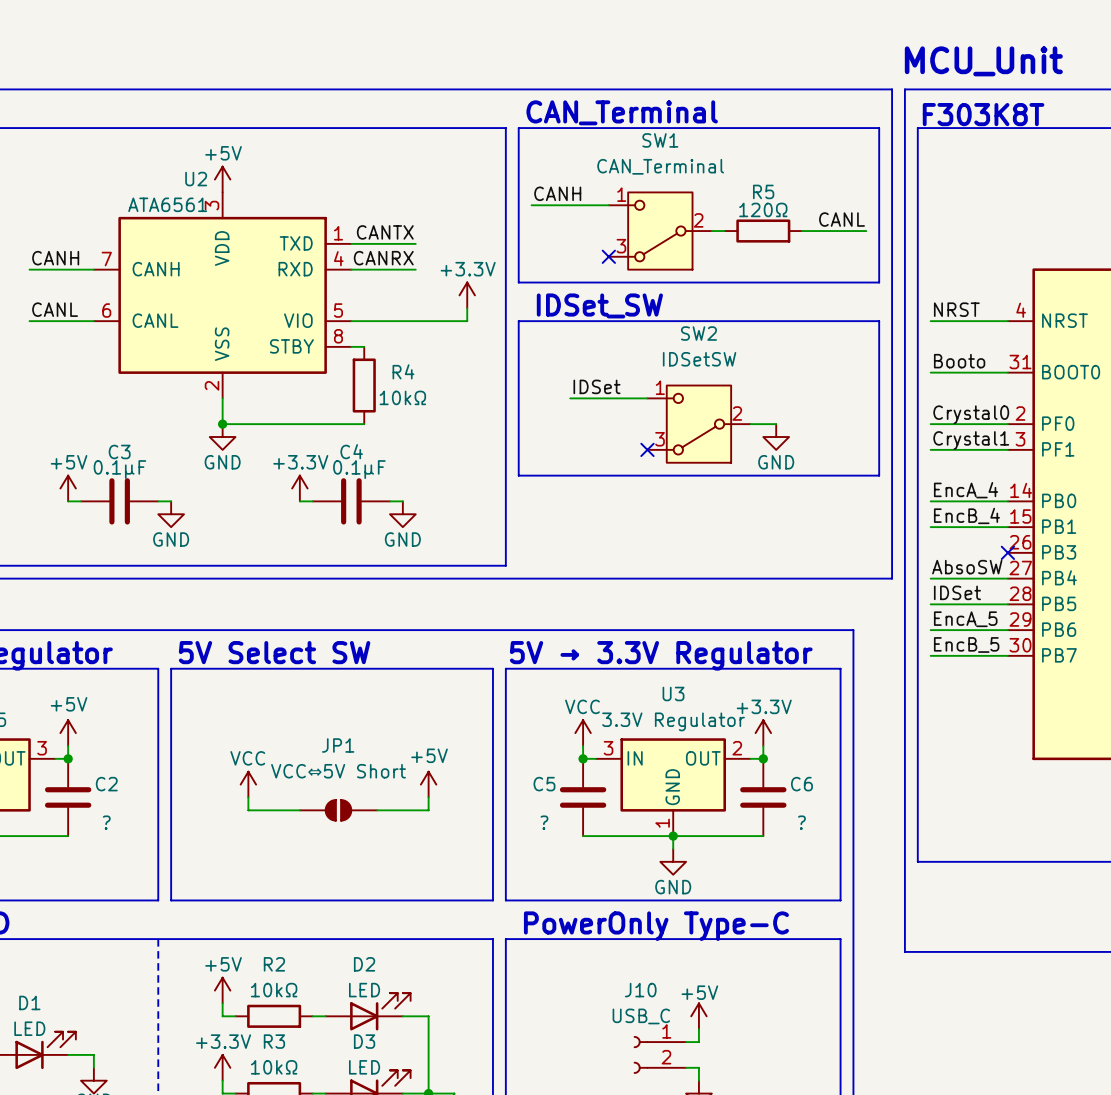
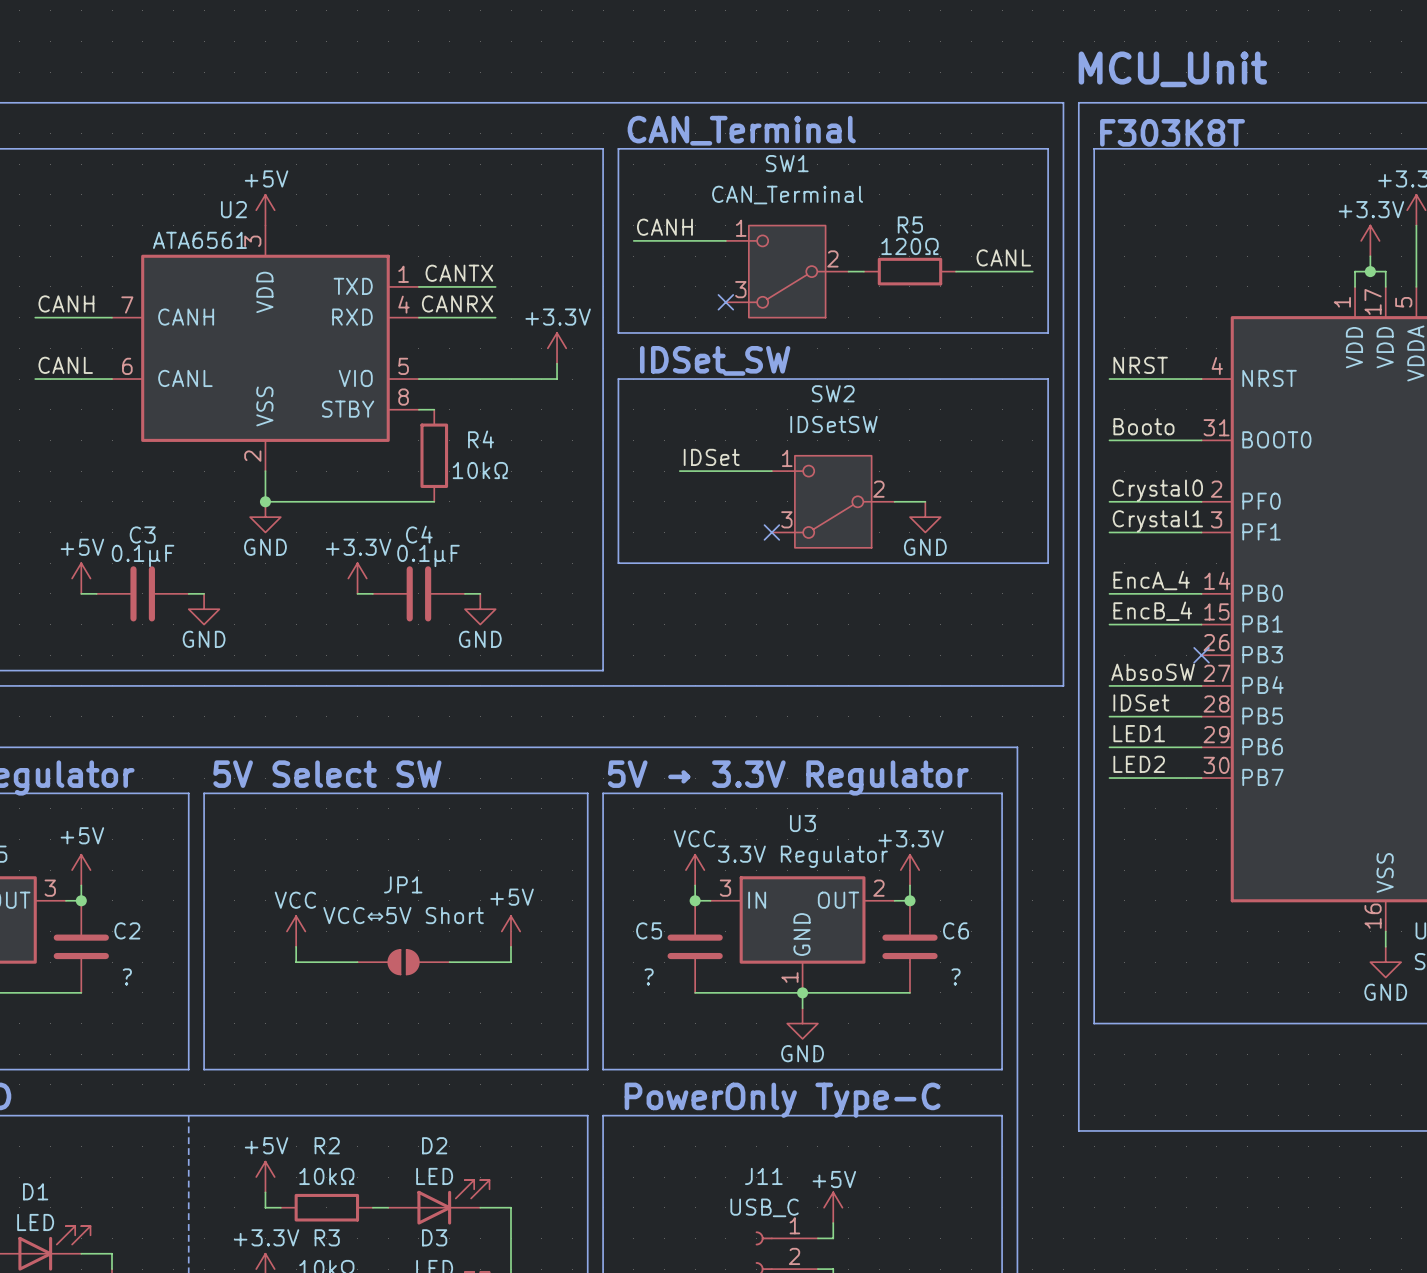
label: EncA_5 (965, 619) -> LED1 (1139, 733)
label: EncB_5 (966, 644) -> LED2 (1139, 764)
J10 name: J10 (640, 990) -> J11 (763, 1176)

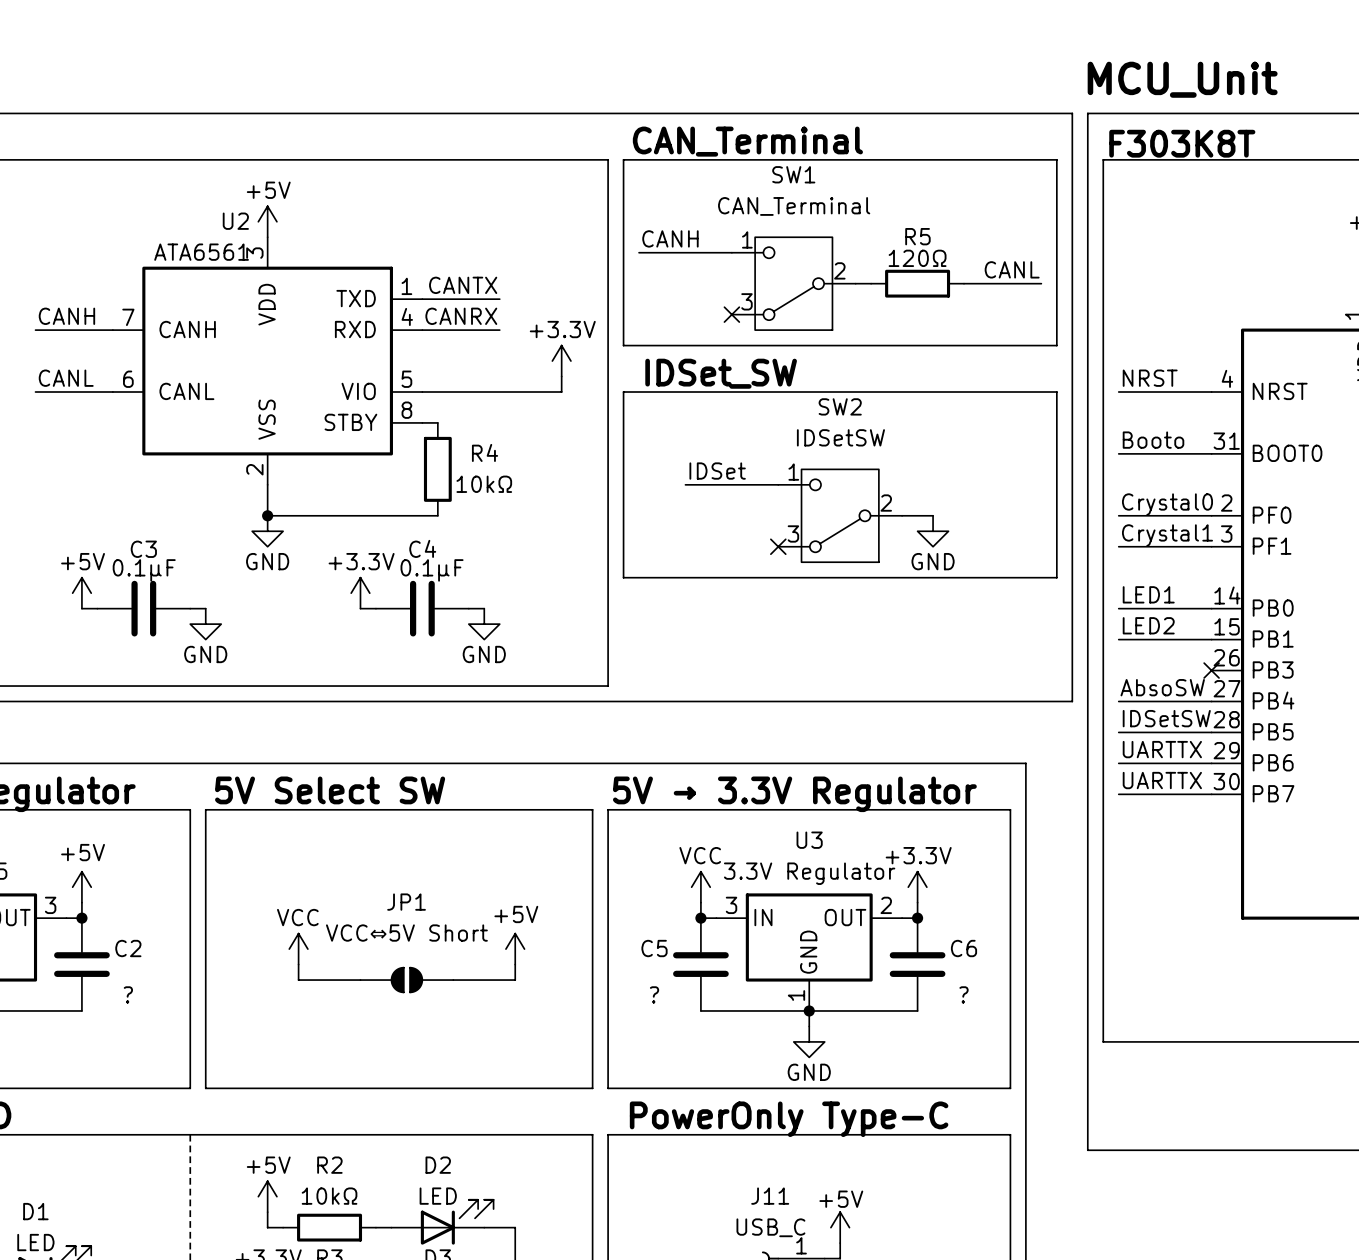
label: EncA_4 (1151, 580) -> LED1 (1148, 594)
label: EncB_4 (1152, 611) -> LED2 (1148, 625)
label: IDSet (1141, 702) -> IDSetSW (1166, 718)
label: LED1 (1139, 733) -> UARTTX (1162, 749)
label: LED2 (1139, 764) -> UARTTX (1162, 780)

